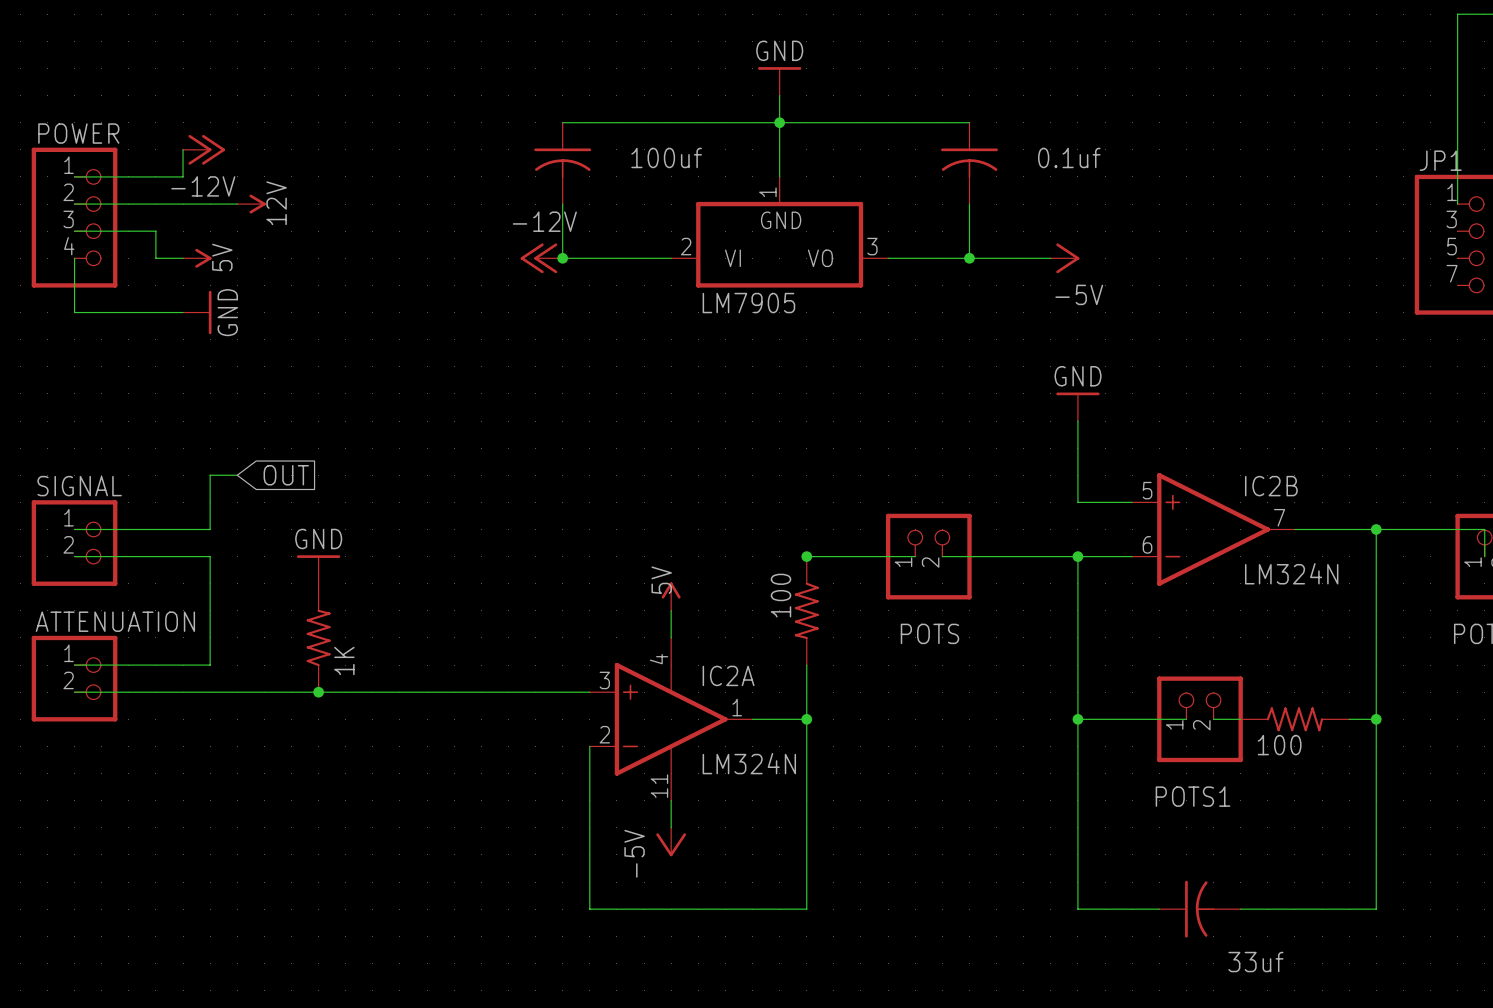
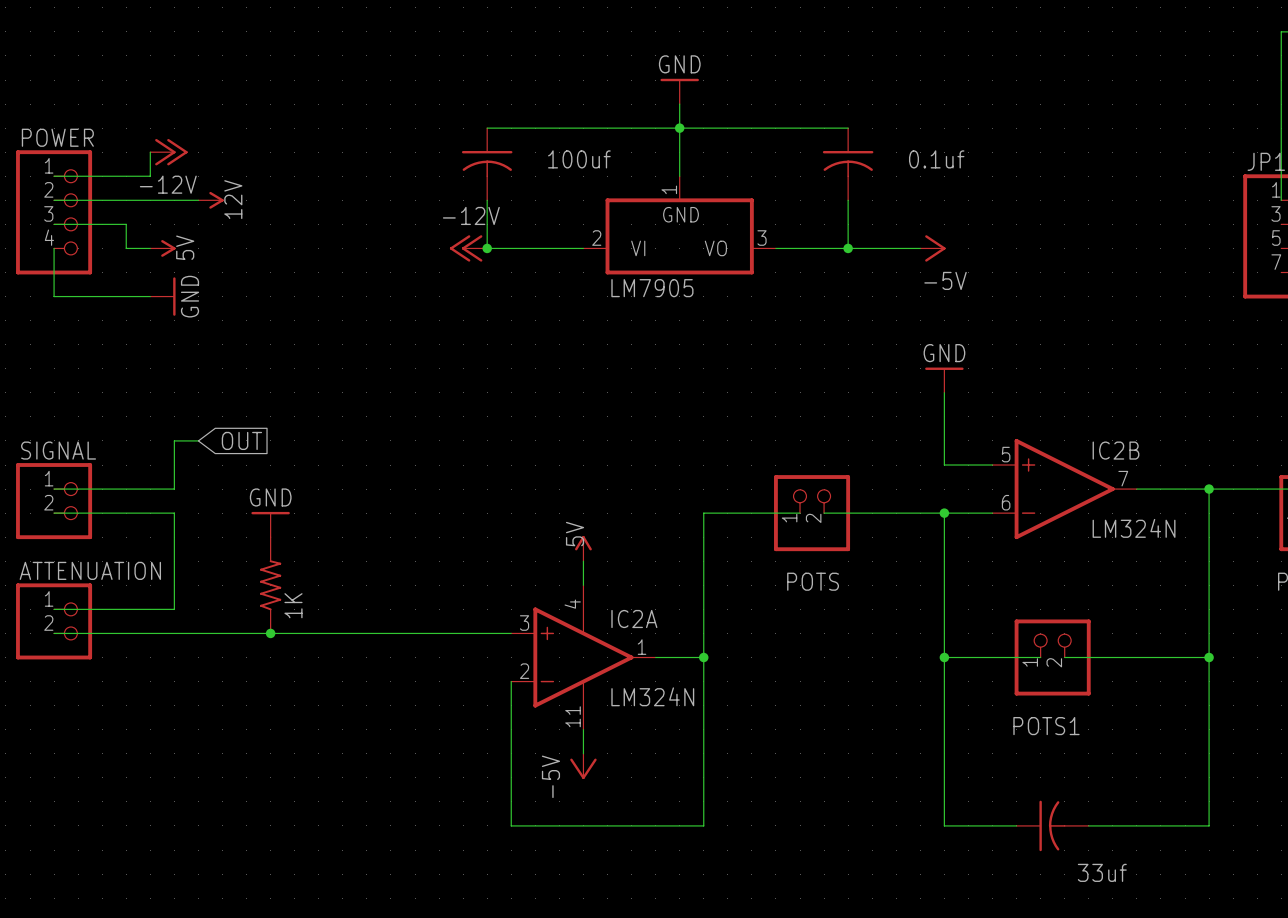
junction: (806, 556) -> none
part: 100 (806, 610) -> none
part: 100 (1294, 719) -> none

